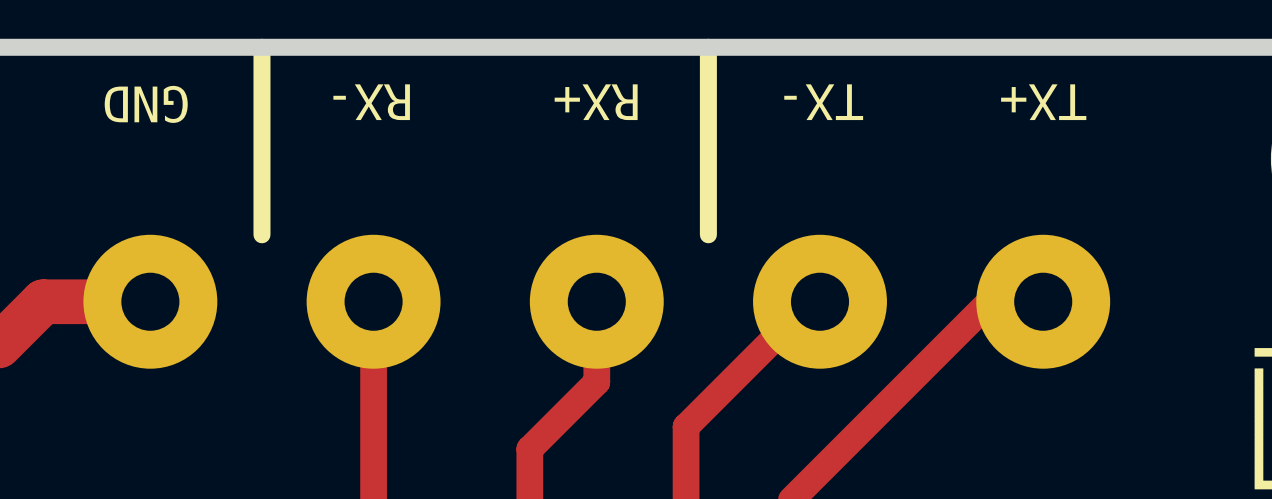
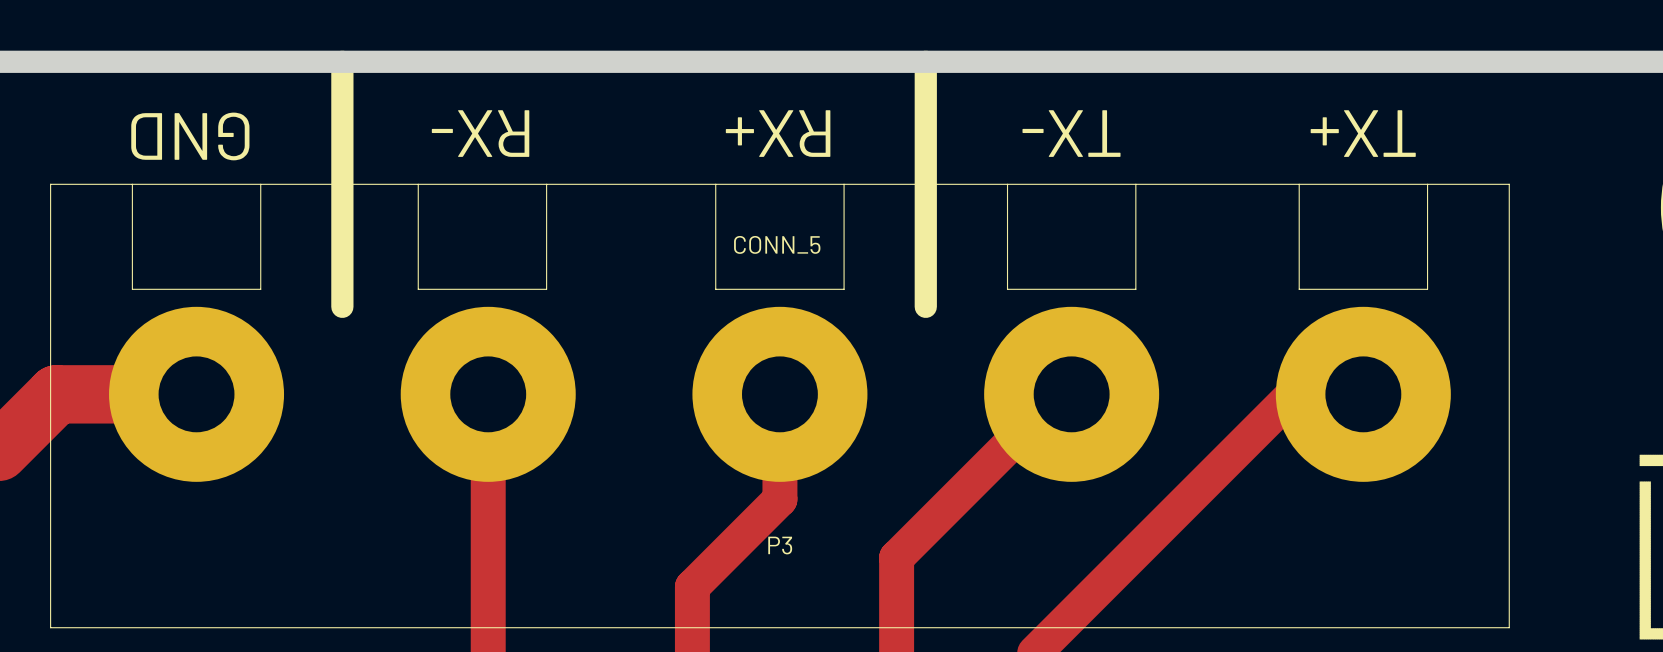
P3: none -> CONN_5 (779, 405)

